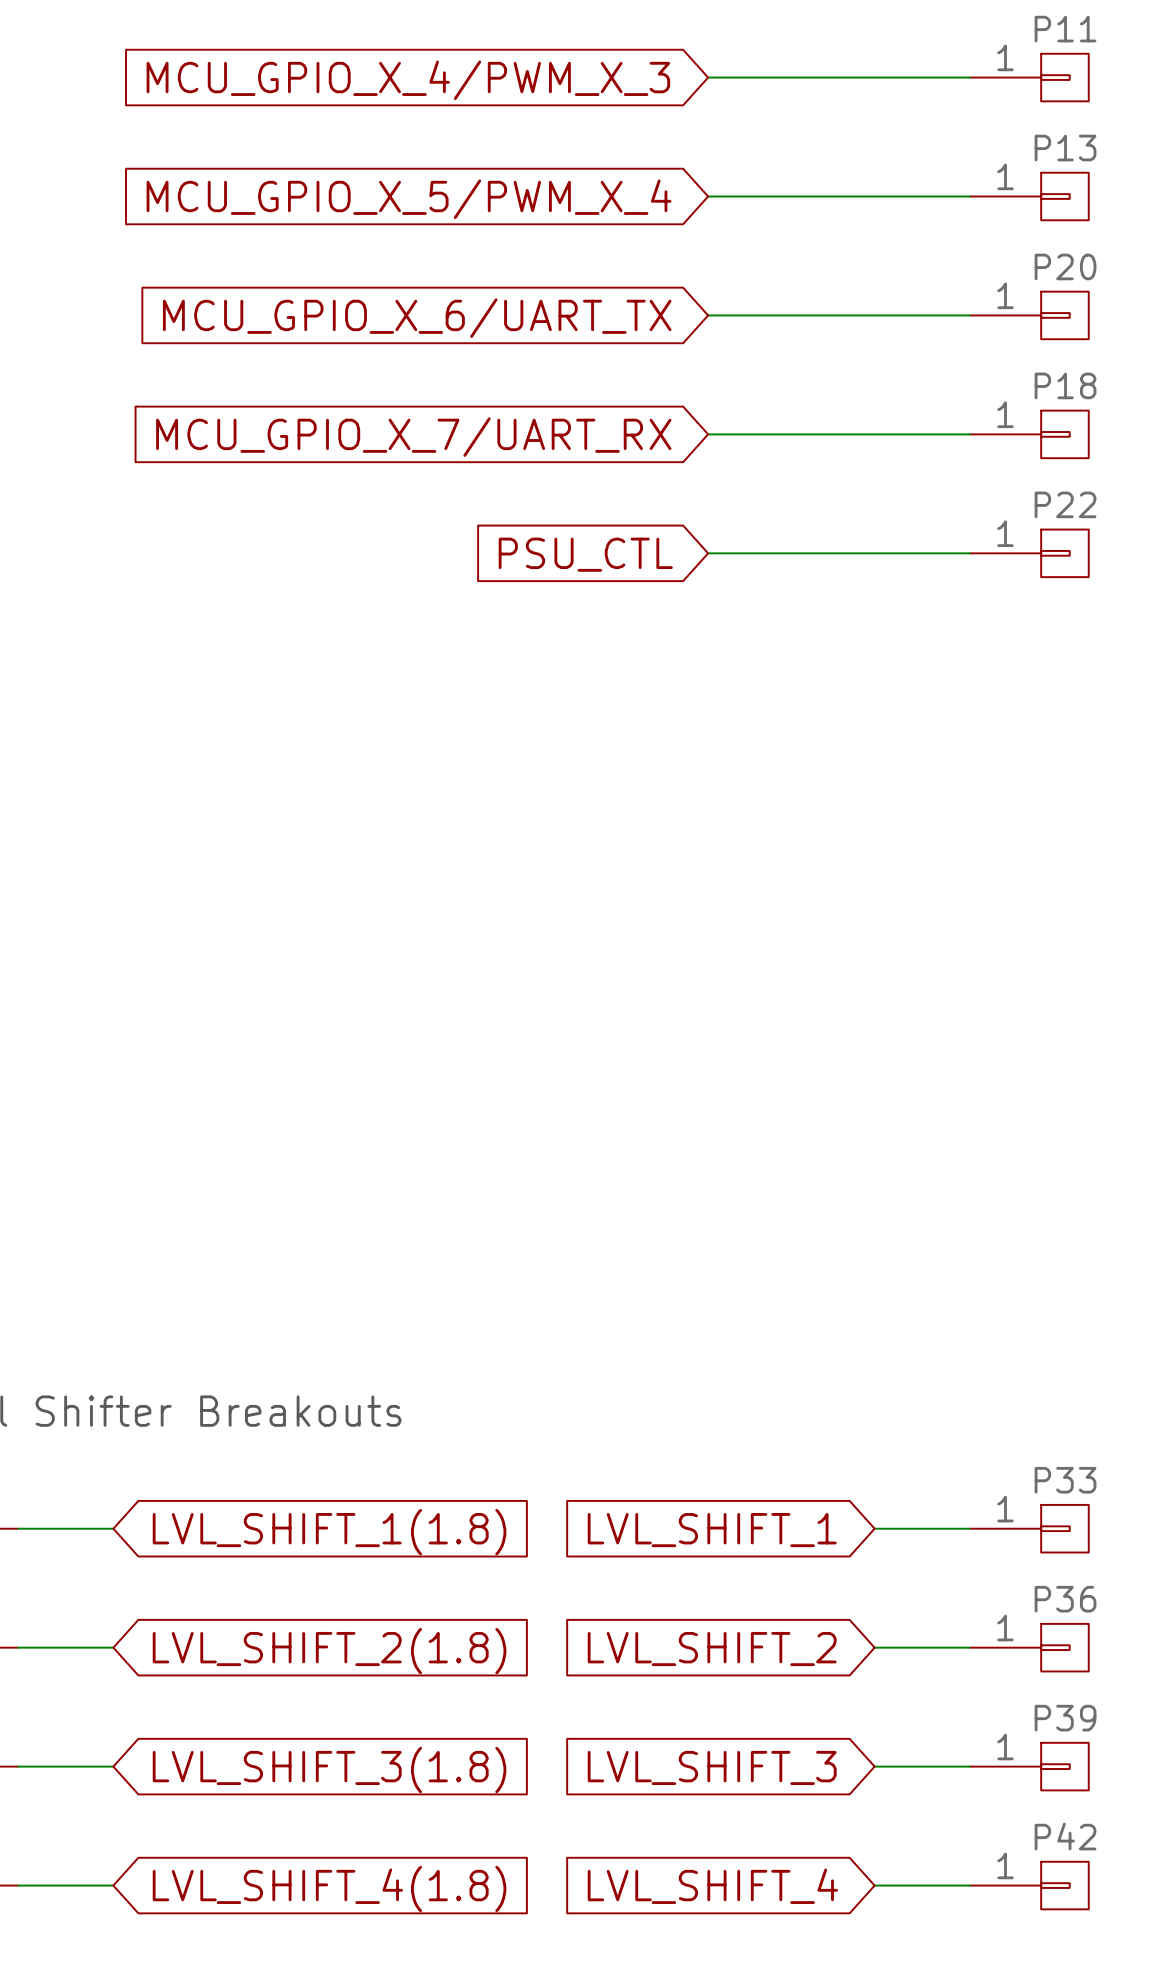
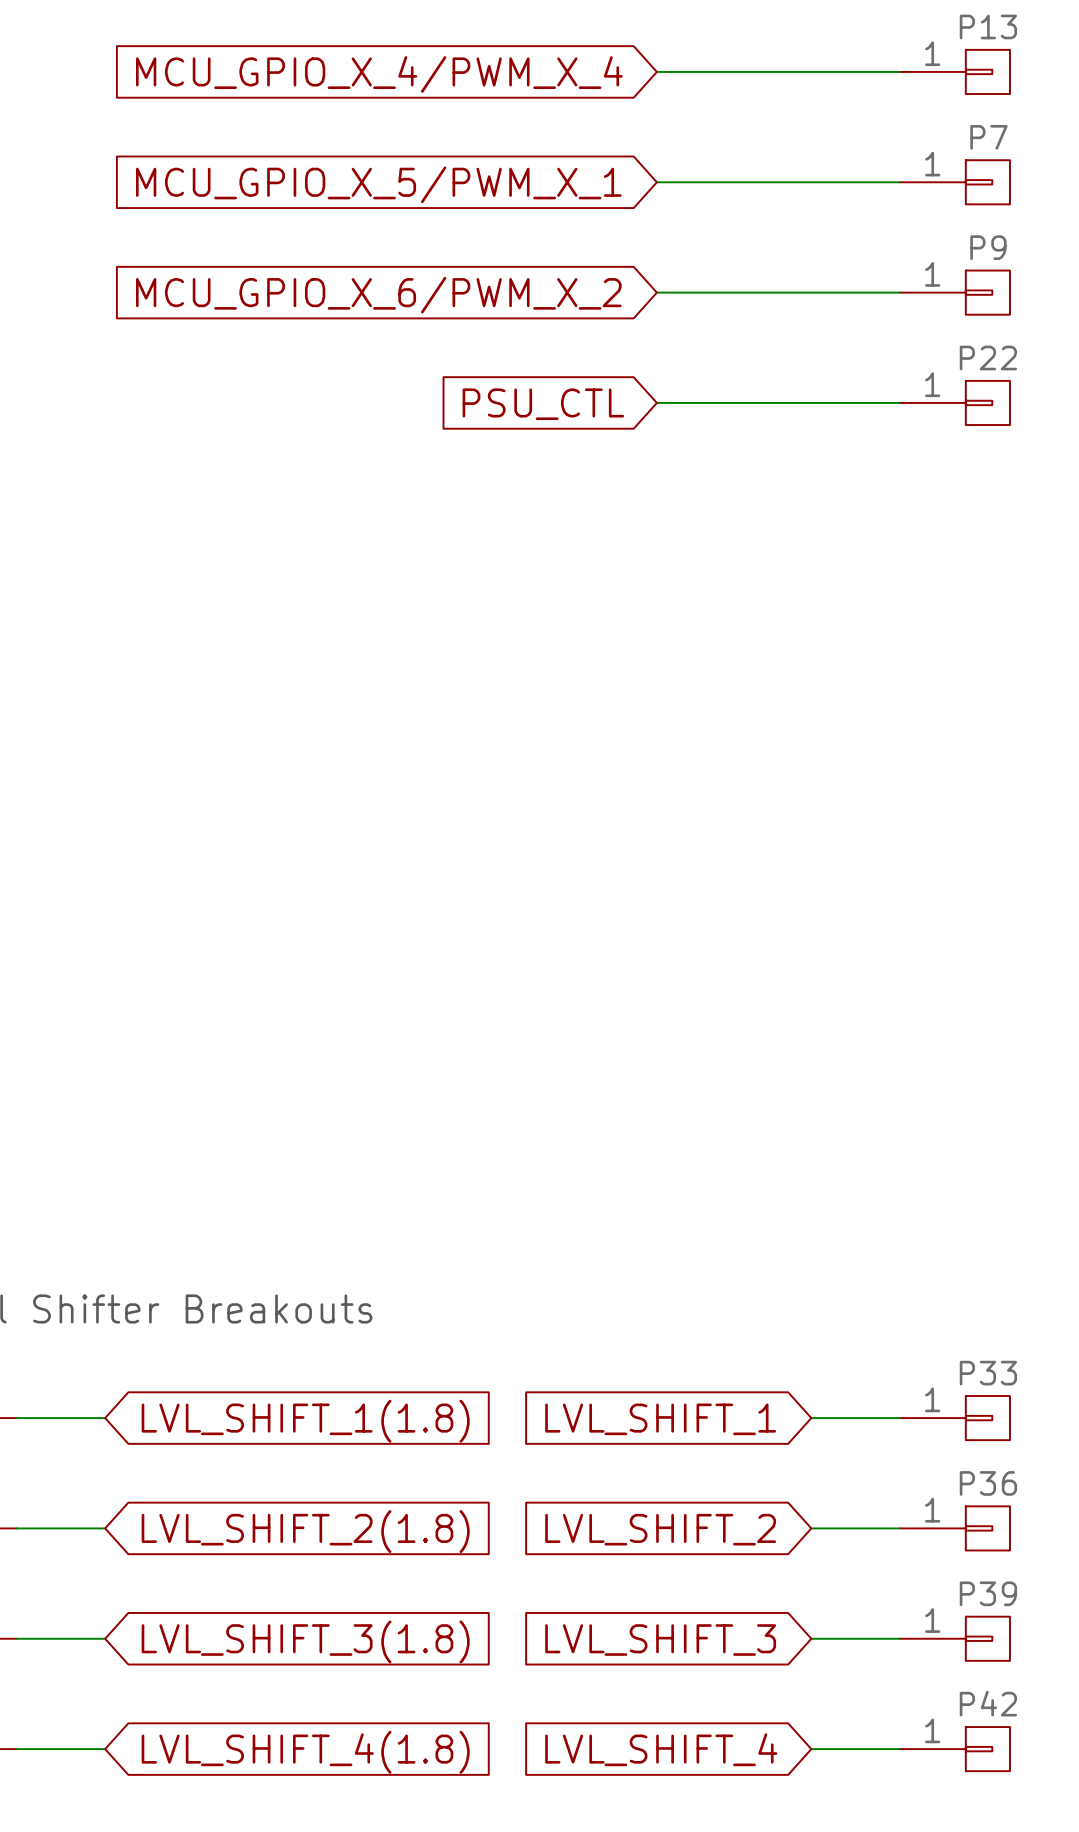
P11 name: P11 (1065, 29) -> P13 (988, 26)
global label: MCU_GPIO_X_4/PWM_X_3 (408, 80) -> MCU_GPIO_X_4/PWM_X_4 (379, 74)
P13 name: P13 (1065, 148) -> P7 (988, 137)
global label: MCU_GPIO_X_5/PWM_X_4 (409, 199) -> MCU_GPIO_X_5/PWM_X_1 (378, 184)
P20 name: P20 (1065, 266) -> P9 (988, 247)
global label: MCU_GPIO_X_6/UART_TX (417, 318) -> MCU_GPIO_X_6/PWM_X_2 (378, 295)
P18 name: P18 (1065, 385) -> P22 (988, 358)
global label: MCU_GPIO_X_7/UART_RX (413, 437) -> PSU_CTL (543, 404)
wire: (708, 553) (969, 553) -> none
P22: (1029, 553) -> none
global label: PSU_CTL (585, 554) -> none

